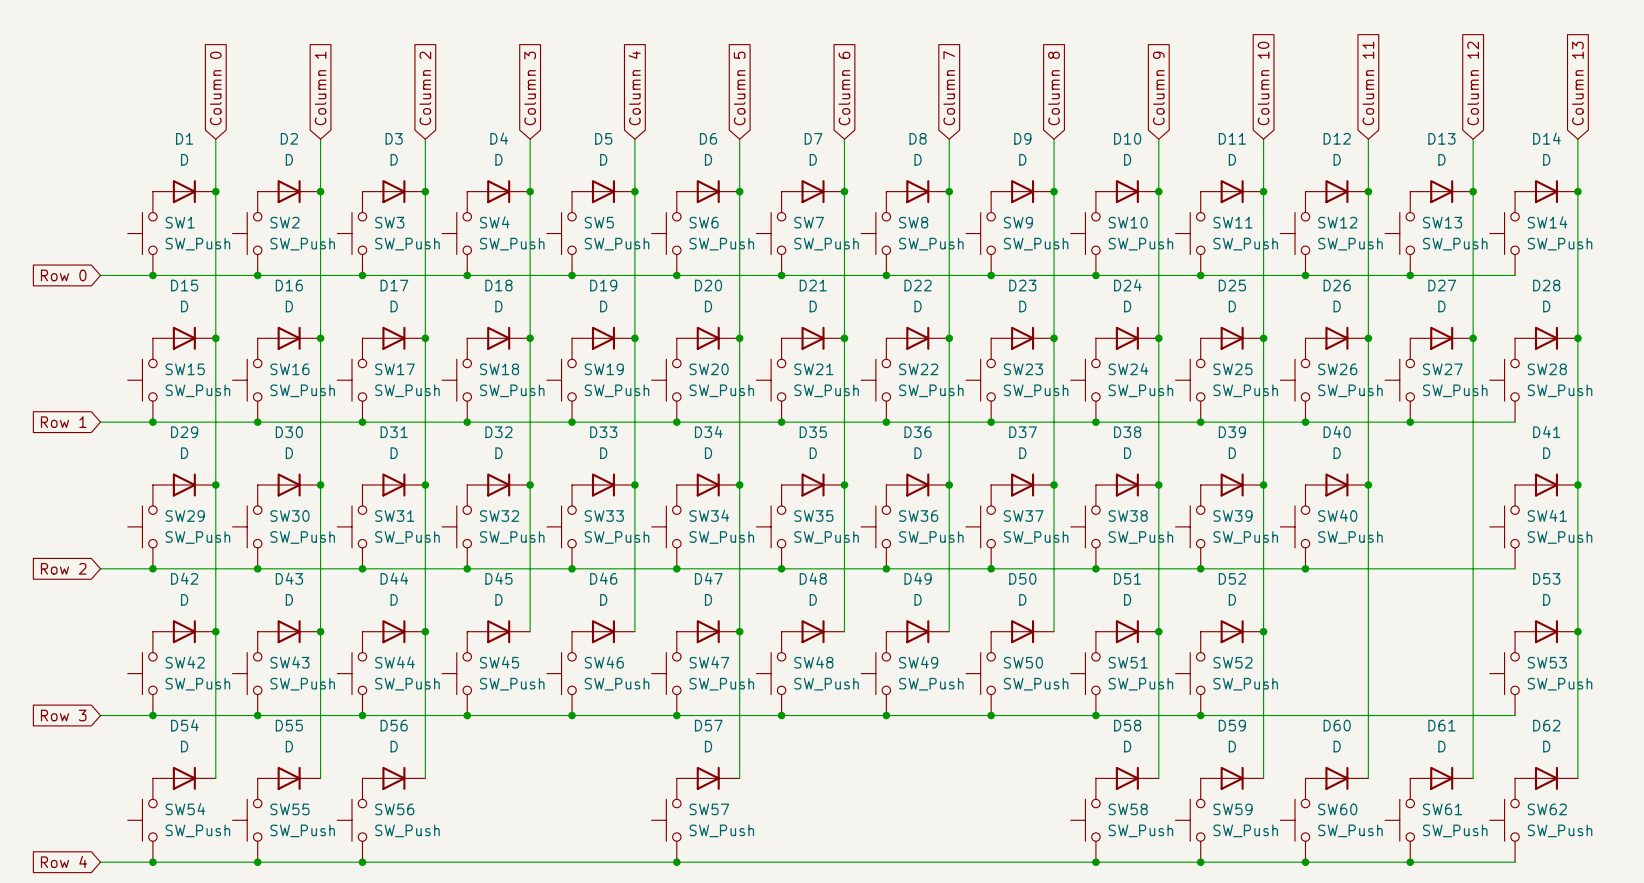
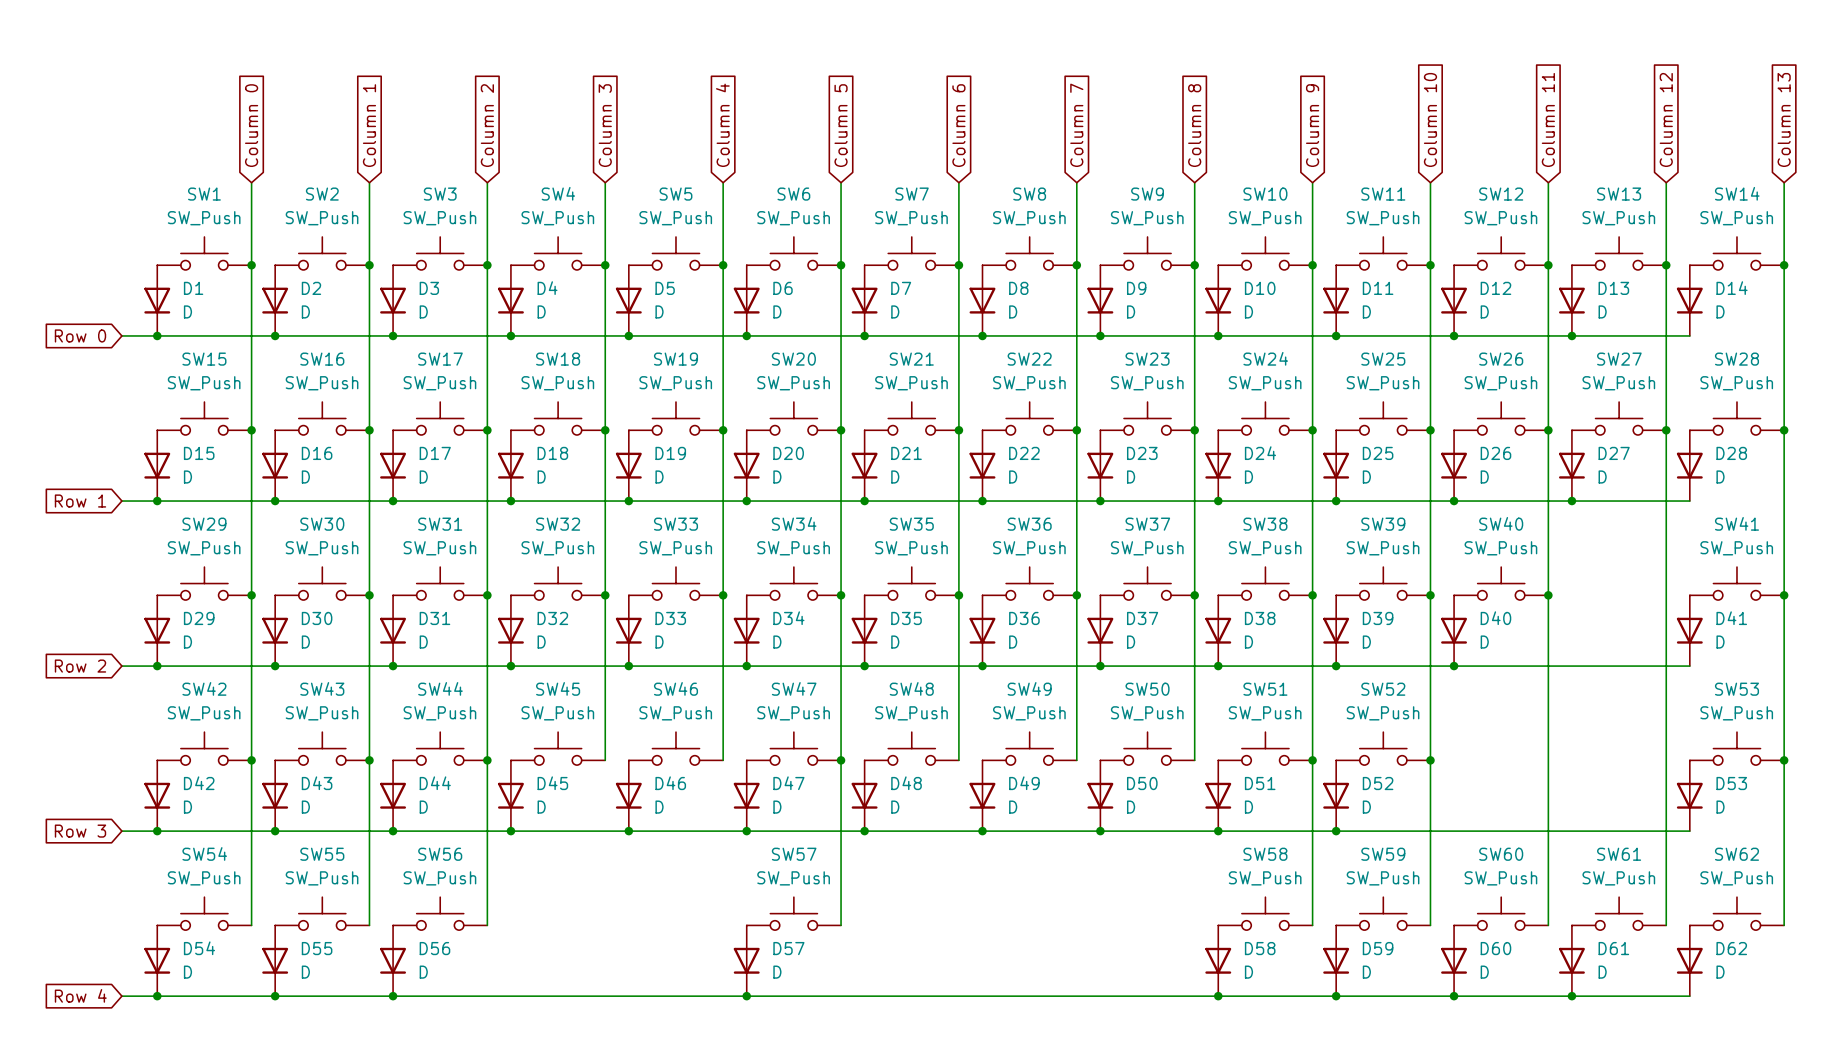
D1 name position: D1 (184, 138) -> D1 (193, 288)
D2 name position: D2 (289, 138) -> D2 (311, 288)
D3 name position: D3 (394, 138) -> D3 (429, 288)
D4 name position: D4 (499, 138) -> D4 (547, 288)
D5 name position: D5 (603, 138) -> D5 (665, 288)
D6 name position: D6 (708, 138) -> D6 (783, 288)
D7 name position: D7 (813, 138) -> D7 (901, 288)
D8 name position: D8 (918, 138) -> D8 (1018, 288)
D9 name position: D9 (1022, 138) -> D9 (1136, 288)
D10 name position: D10 (1127, 138) -> D10 (1260, 288)
D11 name position: D11 (1232, 138) -> D11 (1378, 288)
D12 name position: D12 (1337, 138) -> D12 (1495, 288)
D13 name position: D13 (1441, 138) -> D13 (1613, 288)
D14 name position: D14 (1546, 138) -> D14 (1732, 288)
D1 rotation: 0° (184, 191) -> 90° clockwise (157, 300)
D1 position: (184, 191) -> (157, 300)
junction position: (215, 191) -> (251, 265)
D2 rotation: 0° (289, 191) -> 90° clockwise (275, 300)
D2 position: (289, 191) -> (275, 300)
junction position: (320, 191) -> (369, 265)
D3 rotation: 0° (393, 191) -> 90° clockwise (393, 300)
D3 position: (393, 191) -> (393, 300)
junction position: (425, 191) -> (487, 265)
D4 rotation: 0° (498, 191) -> 90° clockwise (510, 300)
D4 position: (498, 191) -> (510, 300)
junction position: (530, 191) -> (605, 265)
D5 rotation: 0° (603, 191) -> 90° clockwise (628, 300)
D5 position: (603, 191) -> (628, 300)
junction position: (634, 191) -> (723, 265)
D6 rotation: 0° (708, 191) -> 90° clockwise (746, 300)
D6 position: (708, 191) -> (746, 300)
junction position: (739, 191) -> (841, 265)
D7 rotation: 0° (813, 191) -> 90° clockwise (864, 300)
D7 position: (813, 191) -> (864, 300)
junction position: (844, 191) -> (958, 265)
D8 rotation: 0° (917, 191) -> 90° clockwise (982, 300)
D8 position: (917, 191) -> (982, 300)
junction position: (949, 191) -> (1076, 265)
D9 rotation: 0° (1022, 191) -> 90° clockwise (1100, 300)
D9 position: (1022, 191) -> (1100, 300)
junction position: (1054, 191) -> (1194, 265)
D10 rotation: 0° (1127, 191) -> 90° clockwise (1218, 300)
D10 position: (1127, 191) -> (1218, 300)
junction position: (1158, 191) -> (1312, 265)
D11 rotation: 0° (1232, 191) -> 90° clockwise (1336, 300)
D11 position: (1232, 191) -> (1336, 300)
junction position: (1263, 191) -> (1430, 265)
D12 rotation: 0° (1336, 191) -> 90° clockwise (1454, 300)
D12 position: (1336, 191) -> (1454, 300)
junction position: (1368, 191) -> (1548, 265)
D13 rotation: 0° (1441, 191) -> 90° clockwise (1571, 300)
D13 position: (1441, 191) -> (1571, 300)
junction position: (1473, 191) -> (1666, 265)
D14 rotation: 0° (1546, 191) -> 90° clockwise (1689, 300)
D14 position: (1546, 191) -> (1689, 300)
junction position: (1577, 191) -> (1784, 265)
SW1 name position: SW1 (180, 222) -> SW1 (204, 194)
SW2 name position: SW2 (284, 222) -> SW2 (322, 194)
SW3 name position: SW3 (389, 222) -> SW3 (440, 194)
SW4 name position: SW4 (494, 222) -> SW4 (558, 193)
SW5 name position: SW5 (599, 222) -> SW5 (675, 194)
SW6 name position: SW6 (704, 222) -> SW6 (793, 194)
SW7 name position: SW7 (809, 222) -> SW7 (912, 194)
SW8 name position: SW8 (913, 222) -> SW8 (1029, 194)
SW9 name position: SW9 (1018, 222) -> SW9 (1147, 194)
SW10 name position: SW10 (1128, 222) -> SW10 (1265, 194)
SW11 name position: SW11 (1232, 222) -> SW11 (1383, 194)
SW12 name position: SW12 (1337, 222) -> SW12 (1501, 194)
SW13 name position: SW13 (1442, 222) -> SW13 (1619, 194)
SW14 name position: SW14 (1547, 222) -> SW14 (1737, 193)
SW1 rotation: 0° (142, 233) -> 90° clockwise (204, 253)
SW2 rotation: 0° (247, 233) -> 90° clockwise (322, 253)
SW3 rotation: 0° (351, 233) -> 90° clockwise (440, 253)
SW4 rotation: 0° (456, 233) -> 90° clockwise (558, 253)
SW5 rotation: 0° (561, 233) -> 90° clockwise (675, 253)
SW6 rotation: 0° (666, 233) -> 90° clockwise (793, 253)
SW7 rotation: 0° (771, 233) -> 90° clockwise (911, 253)
SW8 rotation: 0° (875, 233) -> 90° clockwise (1029, 253)
SW9 rotation: 0° (980, 233) -> 90° clockwise (1147, 253)
SW10 rotation: 0° (1085, 233) -> 90° clockwise (1265, 253)
SW11 rotation: 0° (1190, 233) -> 90° clockwise (1383, 253)
SW12 rotation: 0° (1295, 233) -> 90° clockwise (1501, 253)
SW13 rotation: 0° (1399, 233) -> 90° clockwise (1619, 253)
SW14 rotation: 0° (1504, 233) -> 90° clockwise (1736, 253)
SW1 value position: SW_Push (197, 244) -> SW_Push (204, 218)
SW2 value position: SW_Push (302, 244) -> SW_Push (322, 218)
SW3 value position: SW_Push (407, 244) -> SW_Push (439, 218)
SW4 value position: SW_Push (512, 244) -> SW_Push (557, 218)
SW5 value position: SW_Push (617, 244) -> SW_Push (675, 218)
SW6 value position: SW_Push (721, 244) -> SW_Push (793, 218)
SW7 value position: SW_Push (826, 244) -> SW_Push (911, 218)
SW8 value position: SW_Push (931, 244) -> SW_Push (1029, 218)
SW9 value position: SW_Push (1036, 244) -> SW_Push (1147, 218)
SW10 value position: SW_Push (1140, 244) -> SW_Push (1265, 218)
SW11 value position: SW_Push (1245, 244) -> SW_Push (1383, 218)
SW12 value position: SW_Push (1350, 244) -> SW_Push (1500, 218)
SW13 value position: SW_Push (1455, 244) -> SW_Push (1618, 218)
SW14 value position: SW_Push (1560, 244) -> SW_Push (1736, 218)
junction position: (152, 275) -> (157, 335)
junction position: (257, 275) -> (275, 335)
junction position: (362, 275) -> (393, 335)
junction position: (467, 275) -> (510, 335)
junction position: (572, 275) -> (628, 335)
junction position: (676, 275) -> (746, 335)
junction position: (781, 275) -> (864, 335)
junction position: (886, 275) -> (982, 335)
junction position: (991, 275) -> (1100, 335)
junction position: (1095, 275) -> (1218, 335)
junction position: (1200, 275) -> (1336, 335)
junction position: (1305, 275) -> (1454, 335)
junction position: (1410, 275) -> (1571, 335)
wire: (1494, 275) (1515, 275) -> none
D15 name position: D15 (184, 285) -> D15 (199, 453)
D16 name position: D16 (289, 285) -> D16 (317, 453)
D17 name position: D17 (394, 285) -> D17 (435, 453)
D18 name position: D18 (498, 285) -> D18 (552, 453)
D19 name position: D19 (603, 285) -> D19 (670, 453)
D20 name position: D20 (708, 285) -> D20 (788, 453)
D21 name position: D21 (813, 285) -> D21 (906, 453)
D22 name position: D22 (918, 285) -> D22 (1024, 453)
D23 name position: D23 (1022, 285) -> D23 (1142, 453)
D24 name position: D24 (1127, 285) -> D24 (1260, 453)
D25 name position: D25 (1232, 285) -> D25 (1378, 453)
D26 name position: D26 (1337, 285) -> D26 (1495, 453)
D27 name position: D27 (1442, 285) -> D27 (1614, 453)
D28 name position: D28 (1546, 285) -> D28 (1731, 453)
D15 rotation: 0° (184, 338) -> 90° clockwise (157, 465)
D15 position: (184, 338) -> (157, 465)
junction position: (215, 338) -> (251, 430)
D16 rotation: 0° (289, 338) -> 90° clockwise (275, 465)
D16 position: (289, 338) -> (275, 465)
junction position: (320, 338) -> (369, 430)
D17 rotation: 0° (393, 338) -> 90° clockwise (393, 465)
D17 position: (393, 338) -> (393, 465)
junction position: (425, 338) -> (487, 430)
D18 rotation: 0° (498, 338) -> 90° clockwise (510, 465)
D18 position: (498, 338) -> (510, 465)
junction position: (530, 338) -> (605, 430)
D19 rotation: 0° (603, 338) -> 90° clockwise (628, 465)
D19 position: (603, 338) -> (628, 465)
junction position: (634, 338) -> (723, 430)
D20 rotation: 0° (708, 338) -> 90° clockwise (746, 465)
D20 position: (708, 338) -> (746, 465)
junction position: (739, 338) -> (841, 430)
D21 rotation: 0° (813, 338) -> 90° clockwise (864, 465)
D21 position: (813, 338) -> (864, 465)
junction position: (844, 338) -> (958, 430)
D22 rotation: 0° (917, 338) -> 90° clockwise (982, 465)
D22 position: (917, 338) -> (982, 465)
junction position: (949, 338) -> (1076, 430)
D23 rotation: 0° (1022, 338) -> 90° clockwise (1100, 465)
D23 position: (1022, 338) -> (1100, 465)
junction position: (1054, 338) -> (1194, 430)
D24 rotation: 0° (1127, 338) -> 90° clockwise (1218, 465)
D24 position: (1127, 338) -> (1218, 465)
junction position: (1158, 338) -> (1312, 430)
D25 rotation: 0° (1232, 338) -> 90° clockwise (1336, 465)
D25 position: (1232, 338) -> (1336, 465)
junction position: (1263, 338) -> (1430, 430)
D26 rotation: 0° (1336, 338) -> 90° clockwise (1454, 465)
D26 position: (1336, 338) -> (1454, 465)
junction position: (1368, 338) -> (1548, 430)
D27 rotation: 0° (1441, 338) -> 90° clockwise (1571, 465)
D27 position: (1441, 338) -> (1571, 465)
junction position: (1473, 338) -> (1666, 430)
D28 rotation: 0° (1546, 338) -> 90° clockwise (1689, 465)
D28 position: (1546, 338) -> (1689, 465)
junction position: (1577, 338) -> (1784, 430)
SW15 name position: SW15 (185, 369) -> SW15 (204, 359)
SW16 name position: SW16 (289, 369) -> SW16 (322, 359)
SW17 name position: SW17 (394, 369) -> SW17 (440, 359)
SW18 name position: SW18 (499, 369) -> SW18 (558, 359)
SW19 name position: SW19 (604, 369) -> SW19 (675, 359)
SW20 name position: SW20 (709, 369) -> SW20 (793, 359)
SW21 name position: SW21 (813, 369) -> SW21 (911, 359)
SW22 name position: SW22 (918, 369) -> SW22 (1029, 359)
SW23 name position: SW23 (1023, 369) -> SW23 (1147, 359)
SW24 name position: SW24 (1128, 369) -> SW24 (1265, 358)
SW25 name position: SW25 (1232, 369) -> SW25 (1383, 359)
SW26 name position: SW26 (1337, 369) -> SW26 (1501, 359)
SW27 name position: SW27 (1442, 369) -> SW27 (1619, 359)
SW28 name position: SW28 (1547, 369) -> SW28 (1736, 359)
SW15 rotation: 0° (142, 380) -> 90° clockwise (204, 418)
SW16 rotation: 0° (247, 380) -> 90° clockwise (322, 418)
SW17 rotation: 0° (351, 380) -> 90° clockwise (440, 418)
SW18 rotation: 0° (456, 380) -> 90° clockwise (558, 418)
SW19 rotation: 0° (561, 380) -> 90° clockwise (675, 418)
SW20 rotation: 0° (666, 380) -> 90° clockwise (793, 418)
SW21 rotation: 0° (771, 380) -> 90° clockwise (911, 418)
SW22 rotation: 0° (875, 380) -> 90° clockwise (1029, 418)
SW23 rotation: 0° (980, 380) -> 90° clockwise (1147, 418)
SW24 rotation: 0° (1085, 380) -> 90° clockwise (1265, 418)
SW25 rotation: 0° (1190, 380) -> 90° clockwise (1383, 418)
SW26 rotation: 0° (1295, 380) -> 90° clockwise (1501, 418)
SW27 rotation: 0° (1399, 380) -> 90° clockwise (1619, 418)
SW28 rotation: 0° (1504, 380) -> 90° clockwise (1736, 418)
SW15 value position: SW_Push (197, 390) -> SW_Push (204, 383)
SW16 value position: SW_Push (302, 390) -> SW_Push (322, 383)
SW17 value position: SW_Push (407, 390) -> SW_Push (439, 383)
SW18 value position: SW_Push (512, 390) -> SW_Push (557, 383)
SW19 value position: SW_Push (617, 390) -> SW_Push (675, 383)
SW20 value position: SW_Push (721, 390) -> SW_Push (793, 383)
SW21 value position: SW_Push (826, 390) -> SW_Push (911, 383)
SW22 value position: SW_Push (931, 390) -> SW_Push (1029, 383)
SW23 value position: SW_Push (1036, 390) -> SW_Push (1147, 383)
SW24 value position: SW_Push (1140, 390) -> SW_Push (1265, 383)
SW25 value position: SW_Push (1245, 390) -> SW_Push (1383, 383)
SW26 value position: SW_Push (1350, 390) -> SW_Push (1500, 383)
SW27 value position: SW_Push (1455, 390) -> SW_Push (1618, 383)
SW28 value position: SW_Push (1560, 390) -> SW_Push (1736, 383)
junction position: (152, 422) -> (157, 501)
junction position: (257, 422) -> (275, 501)
junction position: (362, 422) -> (393, 501)
junction position: (467, 422) -> (510, 501)
junction position: (572, 422) -> (628, 501)
junction position: (676, 422) -> (746, 501)
junction position: (781, 422) -> (864, 501)
junction position: (886, 422) -> (982, 501)
junction position: (991, 422) -> (1100, 501)
junction position: (1095, 422) -> (1218, 501)
junction position: (1200, 422) -> (1336, 501)
junction position: (1305, 422) -> (1454, 501)
junction position: (1410, 422) -> (1571, 501)
wire: (1494, 422) (1515, 422) -> none
D34 name position: D34 (708, 431) -> D34 (788, 618)
D40 name position: D40 (1337, 431) -> D40 (1495, 618)
D41 name position: D41 (1546, 431) -> D41 (1731, 618)
D29 name position: D29 (184, 432) -> D29 (199, 618)
D30 name position: D30 (289, 432) -> D30 (317, 618)
D31 name position: D31 (394, 432) -> D31 (434, 618)
D32 name position: D32 (498, 432) -> D32 (552, 618)
D33 name position: D33 (603, 432) -> D33 (670, 618)
D35 name position: D35 (813, 432) -> D35 (906, 618)
D36 name position: D36 (918, 432) -> D36 (1024, 618)
D37 name position: D37 (1023, 432) -> D37 (1142, 618)
D38 name position: D38 (1127, 432) -> D38 (1260, 618)
D39 name position: D39 (1232, 432) -> D39 (1378, 618)
D29 rotation: 0° (184, 485) -> 90° clockwise (157, 630)
D29 position: (184, 485) -> (157, 630)
junction position: (215, 485) -> (251, 595)
D30 rotation: 0° (289, 485) -> 90° clockwise (275, 630)
D30 position: (289, 485) -> (275, 630)
junction position: (320, 485) -> (369, 595)
D31 rotation: 0° (393, 485) -> 90° clockwise (393, 630)
D31 position: (393, 485) -> (393, 630)
junction position: (425, 485) -> (487, 595)
D32 rotation: 0° (498, 485) -> 90° clockwise (510, 630)
D32 position: (498, 485) -> (510, 630)
junction position: (530, 485) -> (605, 595)
D33 rotation: 0° (603, 485) -> 90° clockwise (628, 630)
D33 position: (603, 485) -> (628, 630)
junction position: (634, 485) -> (723, 595)
D34 rotation: 0° (708, 485) -> 90° clockwise (746, 630)
D34 position: (708, 485) -> (746, 630)
junction position: (739, 485) -> (841, 595)
D35 rotation: 0° (813, 485) -> 90° clockwise (864, 630)
D35 position: (813, 485) -> (864, 630)
junction position: (844, 485) -> (958, 595)
D36 rotation: 0° (917, 485) -> 90° clockwise (982, 630)
D36 position: (917, 485) -> (982, 630)
junction position: (949, 485) -> (1076, 595)
D37 rotation: 0° (1022, 485) -> 90° clockwise (1100, 630)
D37 position: (1022, 485) -> (1100, 630)
junction position: (1054, 485) -> (1194, 595)
D38 rotation: 0° (1127, 485) -> 90° clockwise (1218, 630)
D38 position: (1127, 485) -> (1218, 630)
junction position: (1158, 485) -> (1312, 595)
D39 rotation: 0° (1232, 485) -> 90° clockwise (1336, 630)
D39 position: (1232, 485) -> (1336, 630)
junction position: (1263, 485) -> (1430, 595)
D40 rotation: 0° (1336, 485) -> 90° clockwise (1454, 630)
D40 position: (1336, 485) -> (1454, 630)
junction position: (1368, 485) -> (1548, 595)
D41 rotation: 0° (1546, 485) -> 90° clockwise (1689, 630)
D41 position: (1546, 485) -> (1689, 630)
junction position: (1577, 485) -> (1784, 595)
SW34 name position: SW34 (709, 515) -> SW34 (794, 523)
SW40 name position: SW40 (1337, 515) -> SW40 (1501, 523)
SW41 name position: SW41 (1547, 515) -> SW41 (1736, 523)
SW29 name position: SW29 (185, 516) -> SW29 (204, 524)
SW30 name position: SW30 (289, 516) -> SW30 (322, 524)
SW31 name position: SW31 (394, 516) -> SW31 (440, 524)
SW32 name position: SW32 (499, 516) -> SW32 (558, 524)
SW33 name position: SW33 (604, 516) -> SW33 (675, 524)
SW35 name position: SW35 (813, 516) -> SW35 (911, 524)
SW36 name position: SW36 (918, 516) -> SW36 (1029, 524)
SW37 name position: SW37 (1023, 516) -> SW37 (1147, 524)
SW38 name position: SW38 (1128, 516) -> SW38 (1265, 524)
SW39 name position: SW39 (1232, 516) -> SW39 (1383, 524)
SW29 rotation: 0° (142, 526) -> 90° clockwise (204, 583)
SW30 rotation: 0° (247, 526) -> 90° clockwise (322, 583)
SW31 rotation: 0° (351, 526) -> 90° clockwise (440, 583)
SW32 rotation: 0° (456, 526) -> 90° clockwise (558, 583)
SW33 rotation: 0° (561, 526) -> 90° clockwise (675, 583)
SW34 rotation: 0° (666, 526) -> 90° clockwise (793, 583)
SW35 rotation: 0° (771, 526) -> 90° clockwise (911, 583)
SW36 rotation: 0° (875, 526) -> 90° clockwise (1029, 583)
SW37 rotation: 0° (980, 526) -> 90° clockwise (1147, 583)
SW38 rotation: 0° (1085, 526) -> 90° clockwise (1265, 583)
SW39 rotation: 0° (1190, 526) -> 90° clockwise (1383, 583)
SW40 rotation: 0° (1295, 526) -> 90° clockwise (1501, 583)
SW41 rotation: 0° (1504, 526) -> 90° clockwise (1736, 583)
SW29 value position: SW_Push (197, 537) -> SW_Push (204, 548)
SW30 value position: SW_Push (302, 537) -> SW_Push (322, 548)
SW31 value position: SW_Push (407, 537) -> SW_Push (439, 548)
SW32 value position: SW_Push (512, 537) -> SW_Push (557, 548)
SW33 value position: SW_Push (617, 537) -> SW_Push (675, 548)
SW34 value position: SW_Push (721, 537) -> SW_Push (793, 548)
SW35 value position: SW_Push (826, 537) -> SW_Push (911, 548)
SW36 value position: SW_Push (931, 537) -> SW_Push (1029, 548)
SW37 value position: SW_Push (1036, 537) -> SW_Push (1147, 548)
SW38 value position: SW_Push (1140, 537) -> SW_Push (1265, 548)
SW39 value position: SW_Push (1245, 537) -> SW_Push (1383, 548)
SW40 value position: SW_Push (1350, 537) -> SW_Push (1500, 548)
SW41 value position: SW_Push (1560, 537) -> SW_Push (1736, 548)
junction position: (152, 568) -> (157, 666)
junction position: (257, 568) -> (275, 666)
junction position: (362, 568) -> (393, 666)
junction position: (467, 568) -> (510, 666)
junction position: (572, 568) -> (628, 666)
junction position: (676, 568) -> (746, 666)
junction position: (781, 568) -> (864, 666)
junction position: (886, 568) -> (982, 666)
junction position: (991, 568) -> (1100, 666)
junction position: (1095, 568) -> (1218, 666)
junction position: (1200, 568) -> (1336, 666)
junction position: (1305, 568) -> (1454, 666)
wire: (1494, 568) (1515, 568) -> none
D42 name position: D42 (184, 578) -> D42 (199, 783)
D43 name position: D43 (289, 578) -> D43 (317, 783)
D44 name position: D44 (394, 578) -> D44 (435, 783)
D45 name position: D45 (498, 578) -> D45 (552, 783)
D46 name position: D46 (603, 578) -> D46 (670, 783)
D47 name position: D47 (708, 578) -> D47 (788, 783)
D48 name position: D48 (813, 578) -> D48 (906, 783)
D49 name position: D49 (918, 578) -> D49 (1024, 783)
D50 name position: D50 (1022, 578) -> D50 (1142, 783)
D51 name position: D51 (1127, 578) -> D51 (1260, 783)
D52 name position: D52 (1232, 578) -> D52 (1378, 783)
D53 name position: D53 (1546, 578) -> D53 (1731, 783)
D42 rotation: 0° (184, 631) -> 90° clockwise (157, 795)
D42 position: (184, 631) -> (157, 795)
junction position: (215, 631) -> (251, 760)
D43 rotation: 0° (289, 631) -> 90° clockwise (275, 795)
D43 position: (289, 631) -> (275, 795)
junction position: (320, 631) -> (369, 760)
D44 rotation: 0° (393, 631) -> 90° clockwise (393, 795)
D44 position: (393, 631) -> (393, 795)
junction position: (425, 631) -> (487, 760)
D45 rotation: 0° (498, 631) -> 90° clockwise (510, 795)
D45 position: (498, 631) -> (510, 795)
wire: none -> (605, 736) (605, 760)
D46 rotation: 0° (603, 631) -> 90° clockwise (628, 795)
D46 position: (603, 631) -> (628, 795)
wire: none -> (723, 736) (723, 760)
D47 rotation: 0° (708, 631) -> 90° clockwise (746, 795)
D47 position: (708, 631) -> (746, 795)
junction position: (739, 631) -> (841, 760)
D48 rotation: 0° (813, 631) -> 90° clockwise (864, 795)
D48 position: (813, 631) -> (864, 795)
wire: none -> (958, 736) (958, 760)
D49 rotation: 0° (917, 631) -> 90° clockwise (982, 795)
D49 position: (917, 631) -> (982, 795)
wire: none -> (1076, 736) (1076, 760)
D50 rotation: 0° (1022, 631) -> 90° clockwise (1100, 795)
D50 position: (1022, 631) -> (1100, 795)
wire: none -> (1194, 736) (1194, 760)
D51 rotation: 0° (1127, 631) -> 90° clockwise (1218, 795)
D51 position: (1127, 631) -> (1218, 795)
junction position: (1158, 631) -> (1312, 760)
D52 rotation: 0° (1232, 631) -> 90° clockwise (1336, 795)
D52 position: (1232, 631) -> (1336, 795)
junction position: (1263, 631) -> (1430, 760)
D53 rotation: 0° (1546, 631) -> 90° clockwise (1689, 795)
D53 position: (1546, 631) -> (1689, 795)
junction position: (1577, 631) -> (1784, 760)
SW42 name position: SW42 (185, 662) -> SW42 (204, 688)
SW43 name position: SW43 (289, 662) -> SW43 (322, 688)
SW44 name position: SW44 (394, 662) -> SW44 (440, 688)
SW45 name position: SW45 (499, 662) -> SW45 (558, 688)
SW46 name position: SW46 (604, 662) -> SW46 (675, 688)
SW47 name position: SW47 (709, 662) -> SW47 (794, 688)
SW48 name position: SW48 (813, 662) -> SW48 (911, 688)
SW49 name position: SW49 (918, 662) -> SW49 (1029, 688)
SW50 name position: SW50 (1023, 662) -> SW50 (1147, 689)
SW51 name position: SW51 (1128, 662) -> SW51 (1265, 689)
SW52 name position: SW52 (1232, 662) -> SW52 (1383, 689)
SW53 name position: SW53 (1547, 662) -> SW53 (1736, 689)
SW42 rotation: 0° (142, 673) -> 90° clockwise (204, 748)
SW43 rotation: 0° (247, 673) -> 90° clockwise (322, 748)
SW44 rotation: 0° (351, 673) -> 90° clockwise (440, 748)
SW45 rotation: 0° (456, 673) -> 90° clockwise (558, 748)
SW46 rotation: 0° (561, 673) -> 90° clockwise (675, 748)
SW47 rotation: 0° (666, 673) -> 90° clockwise (793, 748)
SW48 rotation: 0° (771, 673) -> 90° clockwise (911, 748)
SW49 rotation: 0° (875, 673) -> 90° clockwise (1029, 748)
SW50 rotation: 0° (980, 673) -> 90° clockwise (1147, 748)
SW51 rotation: 0° (1085, 673) -> 90° clockwise (1265, 748)
SW52 rotation: 0° (1190, 673) -> 90° clockwise (1383, 748)
SW53 rotation: 0° (1504, 673) -> 90° clockwise (1736, 748)
SW42 value position: SW_Push (197, 684) -> SW_Push (204, 713)
SW43 value position: SW_Push (302, 684) -> SW_Push (322, 713)
SW44 value position: SW_Push (407, 684) -> SW_Push (439, 713)
SW45 value position: SW_Push (512, 684) -> SW_Push (557, 713)
SW46 value position: SW_Push (617, 684) -> SW_Push (675, 713)
SW47 value position: SW_Push (721, 684) -> SW_Push (793, 713)
SW48 value position: SW_Push (826, 684) -> SW_Push (911, 713)
SW49 value position: SW_Push (931, 684) -> SW_Push (1029, 713)
SW50 value position: SW_Push (1036, 684) -> SW_Push (1147, 713)
SW51 value position: SW_Push (1140, 684) -> SW_Push (1265, 713)
SW52 value position: SW_Push (1245, 684) -> SW_Push (1383, 713)
SW53 value position: SW_Push (1560, 684) -> SW_Push (1736, 713)
junction position: (152, 715) -> (157, 831)
junction position: (257, 715) -> (275, 831)
junction position: (362, 715) -> (393, 831)
junction position: (467, 715) -> (510, 831)
junction position: (572, 715) -> (628, 831)
junction position: (676, 715) -> (746, 831)
junction position: (781, 715) -> (864, 831)
junction position: (886, 715) -> (982, 831)
junction position: (991, 715) -> (1100, 831)
junction position: (1095, 715) -> (1218, 831)
junction position: (1200, 715) -> (1336, 831)
wire: (1494, 715) (1515, 715) -> none
D54 name position: D54 (184, 725) -> D54 (199, 948)
D55 name position: D55 (289, 725) -> D55 (317, 948)
D56 name position: D56 (394, 725) -> D56 (434, 948)
D57 name position: D57 (708, 725) -> D57 (788, 948)
D58 name position: D58 (1127, 725) -> D58 (1260, 948)
D59 name position: D59 (1232, 725) -> D59 (1378, 948)
D60 name position: D60 (1337, 725) -> D60 (1495, 948)
D61 name position: D61 (1441, 725) -> D61 (1613, 948)
D62 name position: D62 (1546, 725) -> D62 (1731, 948)
D54 rotation: 0° (184, 778) -> 90° clockwise (157, 960)
D54 position: (184, 778) -> (157, 960)
wire: none -> (251, 901) (251, 925)
D55 rotation: 0° (289, 778) -> 90° clockwise (275, 960)
D55 position: (289, 778) -> (275, 960)
wire: none -> (369, 901) (369, 925)
D56 rotation: 0° (393, 778) -> 90° clockwise (393, 960)
D56 position: (393, 778) -> (393, 960)
wire: none -> (487, 901) (487, 925)
D57 rotation: 0° (708, 778) -> 90° clockwise (746, 960)
D57 position: (708, 778) -> (746, 960)
wire: none -> (841, 901) (841, 925)
D58 rotation: 0° (1127, 778) -> 90° clockwise (1218, 960)
D58 position: (1127, 778) -> (1218, 960)
wire: none -> (1312, 901) (1312, 925)
D59 rotation: 0° (1232, 778) -> 90° clockwise (1336, 960)
D59 position: (1232, 778) -> (1336, 960)
wire: none -> (1430, 901) (1430, 925)
D60 rotation: 0° (1336, 778) -> 90° clockwise (1454, 960)
D60 position: (1336, 778) -> (1454, 960)
wire: none -> (1548, 901) (1548, 925)
D61 rotation: 0° (1441, 778) -> 90° clockwise (1571, 960)
D61 position: (1441, 778) -> (1571, 960)
wire: none -> (1666, 901) (1666, 925)
D62 rotation: 0° (1546, 778) -> 90° clockwise (1689, 960)
D62 position: (1546, 778) -> (1689, 960)
wire: none -> (1784, 901) (1784, 925)
SW54 name position: SW54 (185, 809) -> SW54 (204, 853)
SW55 name position: SW55 (289, 809) -> SW55 (322, 854)
SW56 name position: SW56 (394, 809) -> SW56 (440, 854)
SW57 name position: SW57 (709, 809) -> SW57 (794, 854)
SW58 name position: SW58 (1128, 809) -> SW58 (1265, 854)
SW59 name position: SW59 (1232, 809) -> SW59 (1383, 854)
SW60 name position: SW60 (1337, 809) -> SW60 (1501, 854)
SW61 name position: SW61 (1442, 809) -> SW61 (1619, 854)
SW62 name position: SW62 (1547, 809) -> SW62 (1736, 854)
SW54 rotation: 0° (142, 820) -> 90° clockwise (204, 913)
SW55 rotation: 0° (247, 820) -> 90° clockwise (322, 913)
SW56 rotation: 0° (351, 820) -> 90° clockwise (440, 913)
SW57 rotation: 0° (666, 820) -> 90° clockwise (793, 913)
SW58 rotation: 0° (1085, 820) -> 90° clockwise (1265, 913)
SW59 rotation: 0° (1190, 820) -> 90° clockwise (1383, 913)
SW60 rotation: 0° (1295, 820) -> 90° clockwise (1501, 913)
SW61 rotation: 0° (1399, 820) -> 90° clockwise (1619, 913)
SW62 rotation: 0° (1504, 820) -> 90° clockwise (1736, 913)
SW54 value position: SW_Push (197, 830) -> SW_Push (204, 878)
SW55 value position: SW_Push (302, 830) -> SW_Push (322, 878)
SW56 value position: SW_Push (407, 830) -> SW_Push (439, 878)
SW57 value position: SW_Push (721, 830) -> SW_Push (793, 878)
SW58 value position: SW_Push (1140, 830) -> SW_Push (1265, 878)
SW59 value position: SW_Push (1245, 830) -> SW_Push (1383, 878)
SW60 value position: SW_Push (1350, 830) -> SW_Push (1500, 878)
SW61 value position: SW_Push (1455, 830) -> SW_Push (1618, 878)
SW62 value position: SW_Push (1560, 830) -> SW_Push (1736, 878)
junction position: (152, 862) -> (157, 996)
junction position: (257, 862) -> (275, 996)
junction position: (362, 862) -> (393, 996)
junction position: (676, 862) -> (746, 996)
junction position: (1095, 862) -> (1218, 996)
junction position: (1200, 862) -> (1336, 996)
junction position: (1305, 862) -> (1454, 996)
junction position: (1410, 862) -> (1571, 996)
wire: (1494, 862) (1515, 862) -> none

